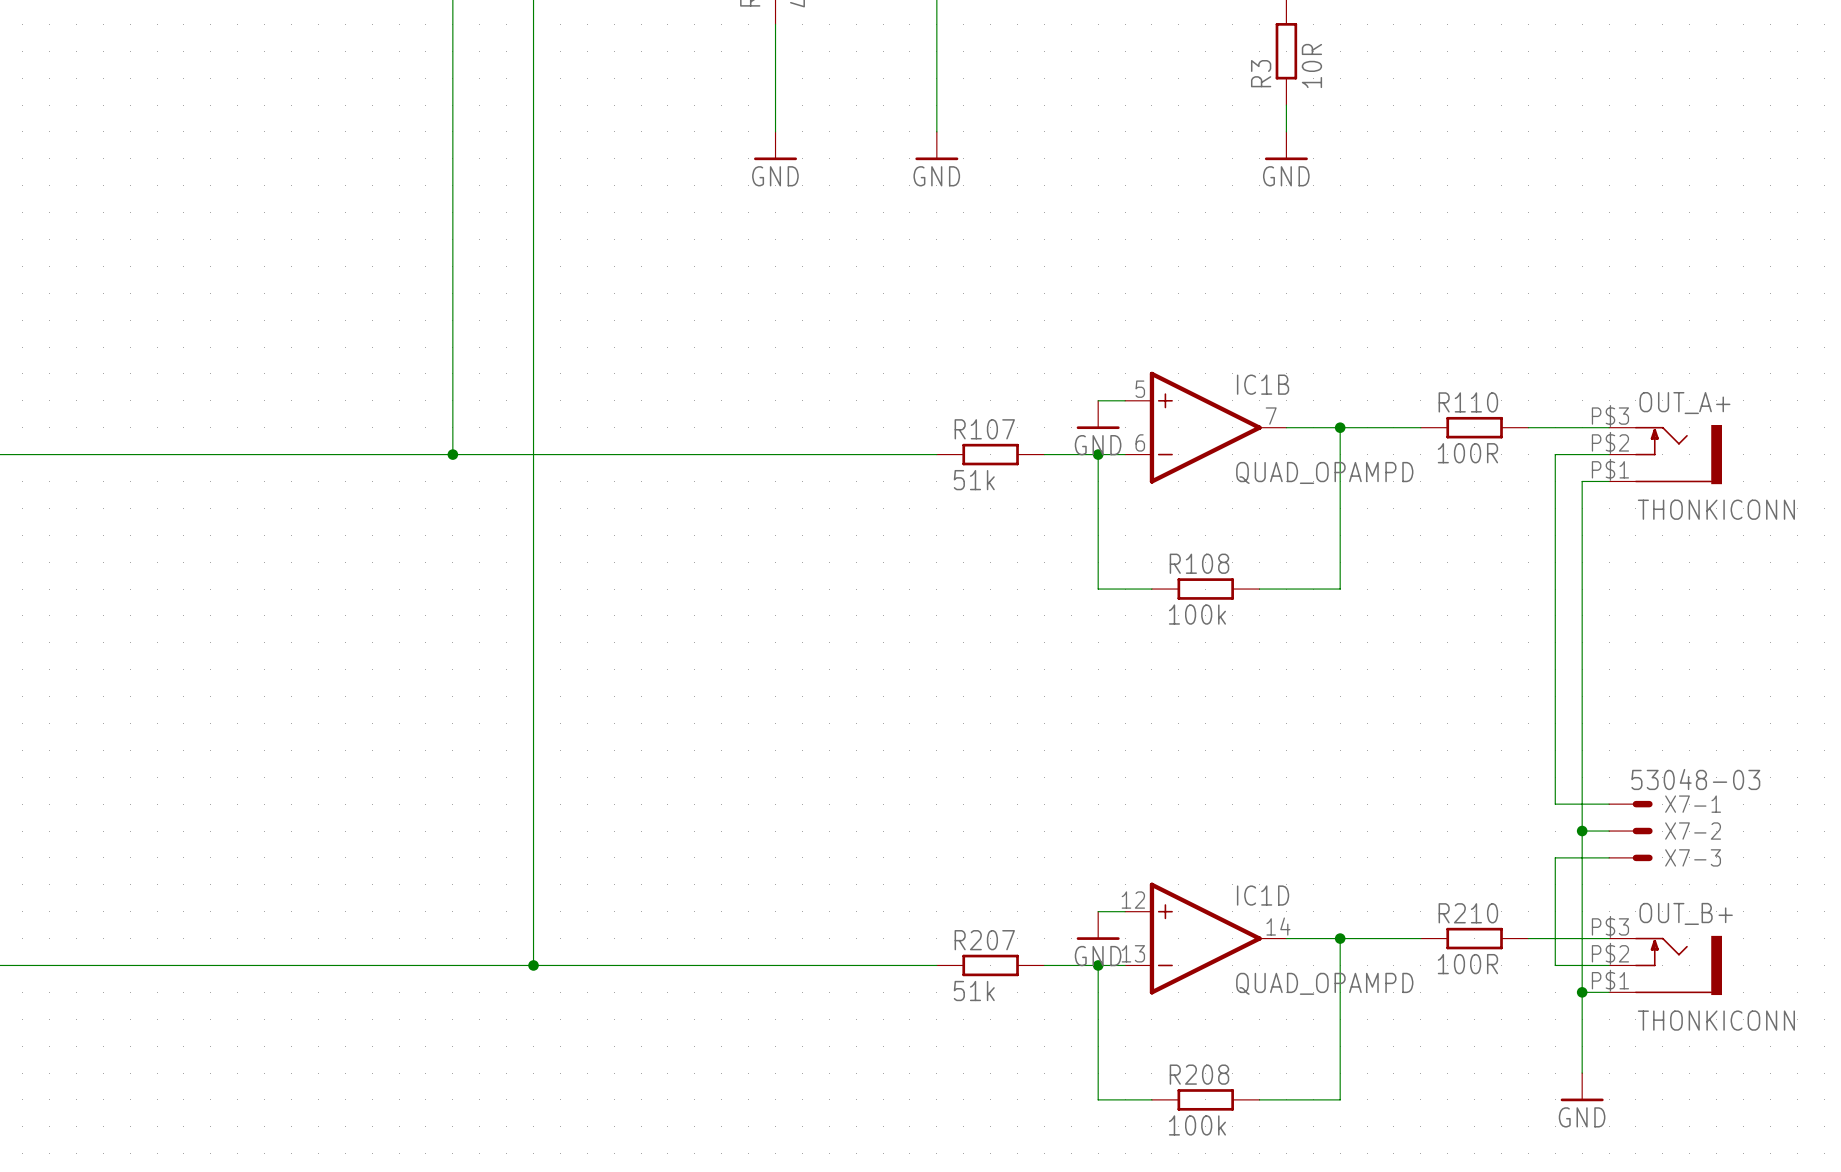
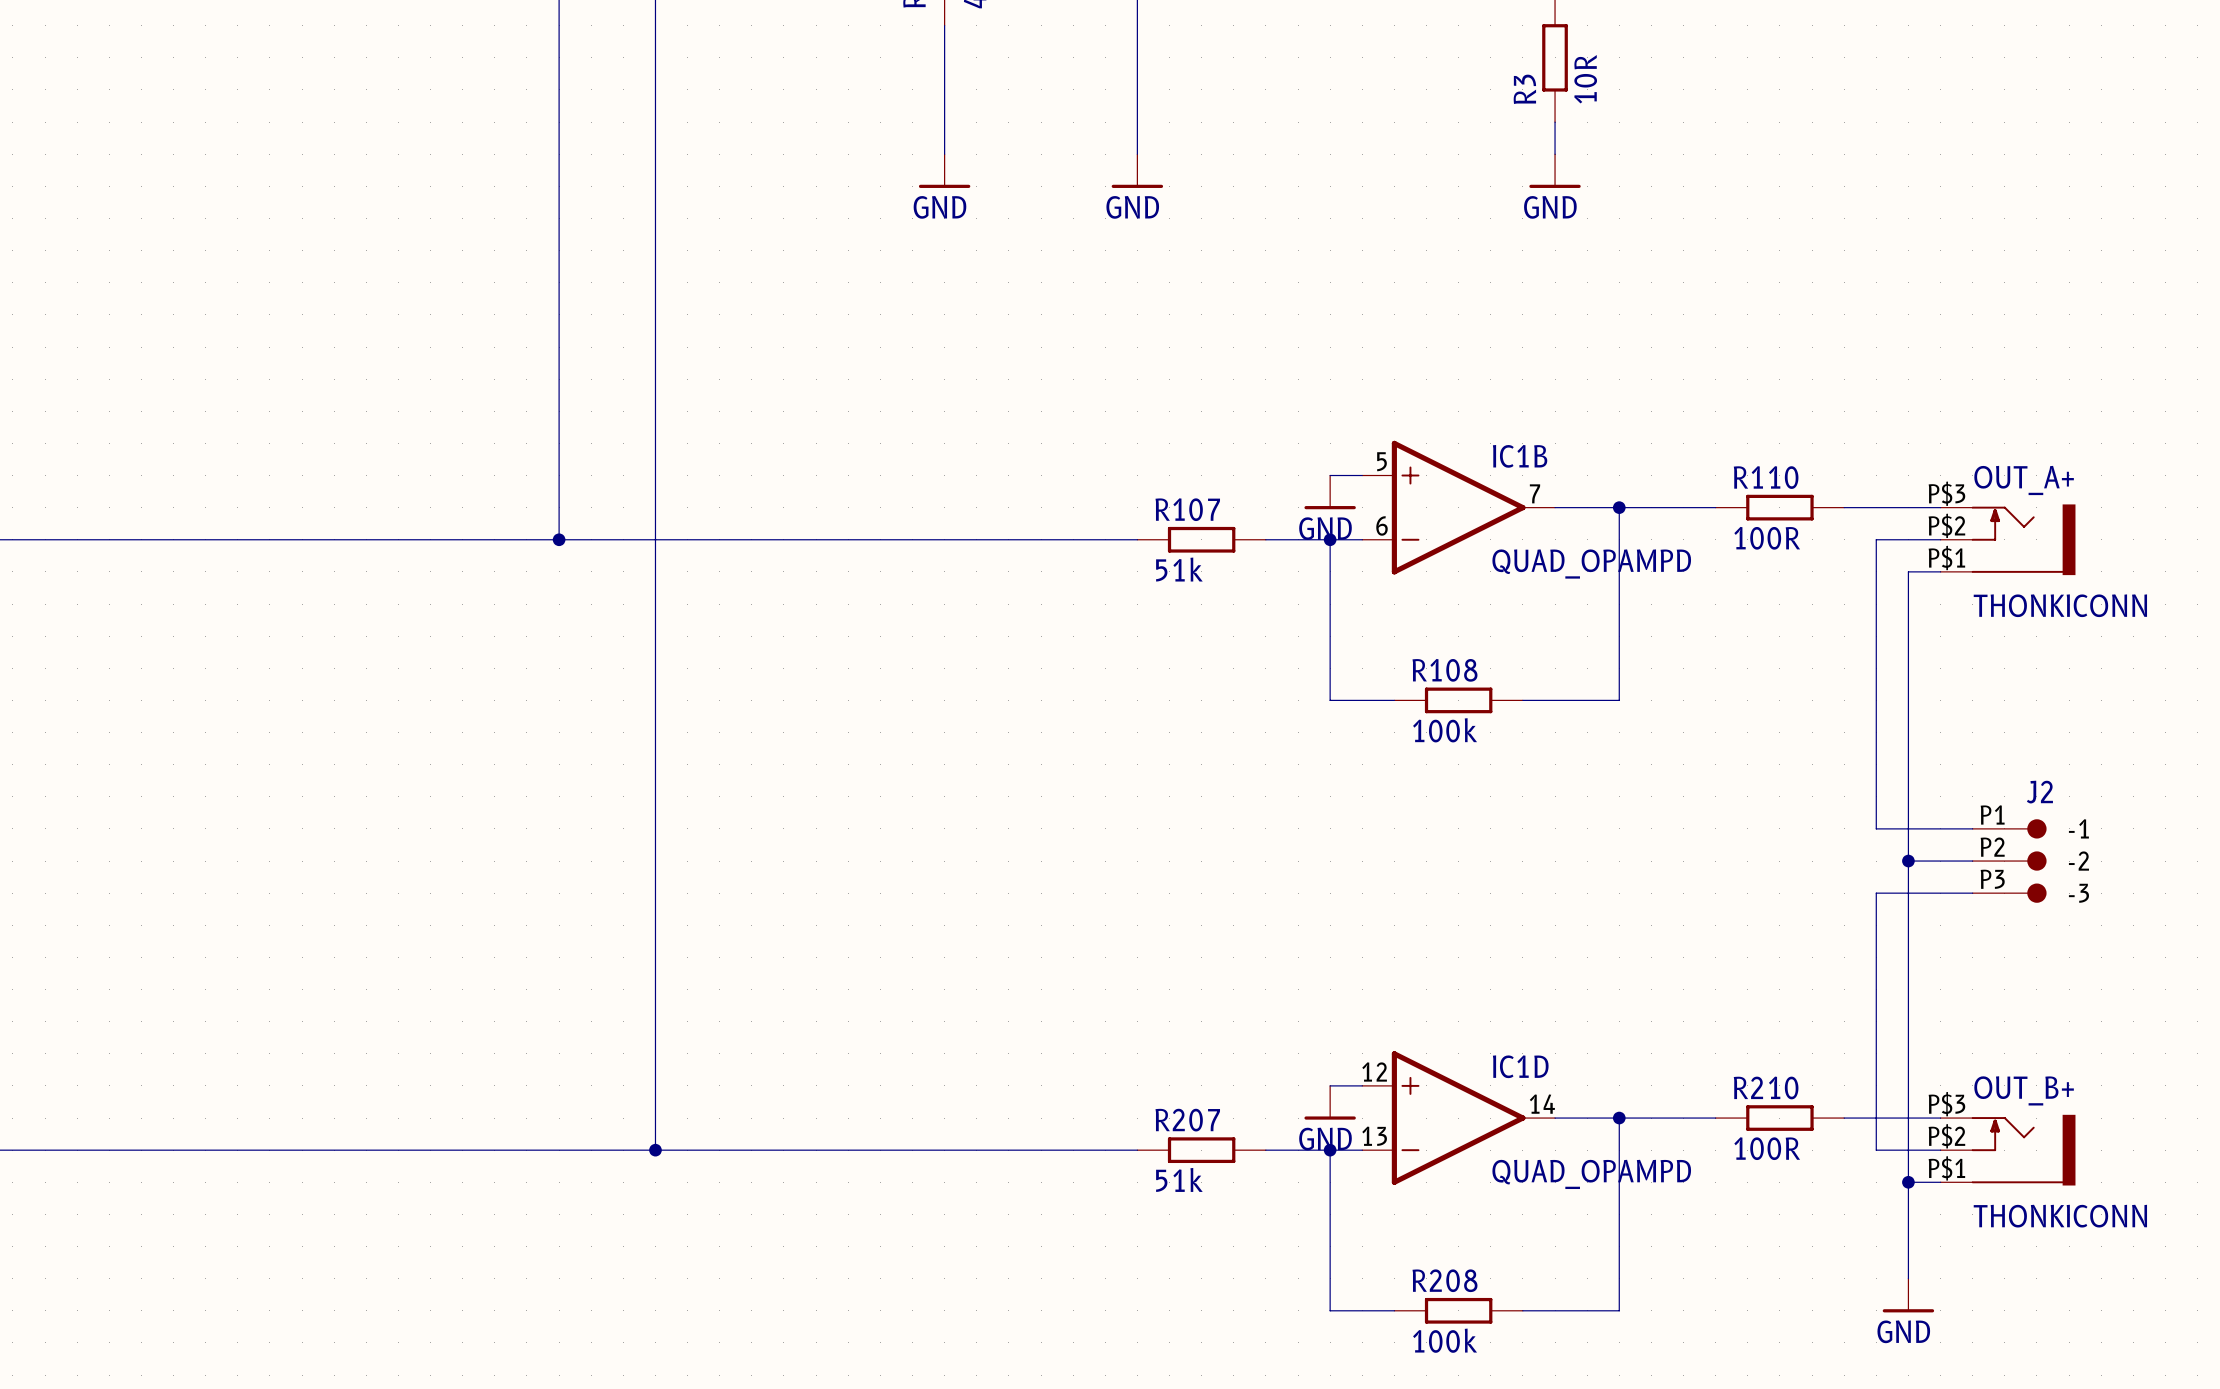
wire: (1555, 696) (1555, 750) -> (1876, 828) (1972, 828)
junction: none -> (1908, 861)
J2: none -> (2009, 861)
wire: none -> (1876, 893) (1972, 893)
wire: (1555, 804) (1609, 804) -> (1876, 957) (1876, 1021)
X7-1: 53048-03 (1630, 804) -> none
wire: (1582, 831) (1609, 831) -> none
junction: (1582, 831) -> none
X7-2: (1630, 831) -> none
wire: (1555, 857) (1609, 857) -> (1908, 861) (1972, 861)
X7-3: (1630, 857) -> none

